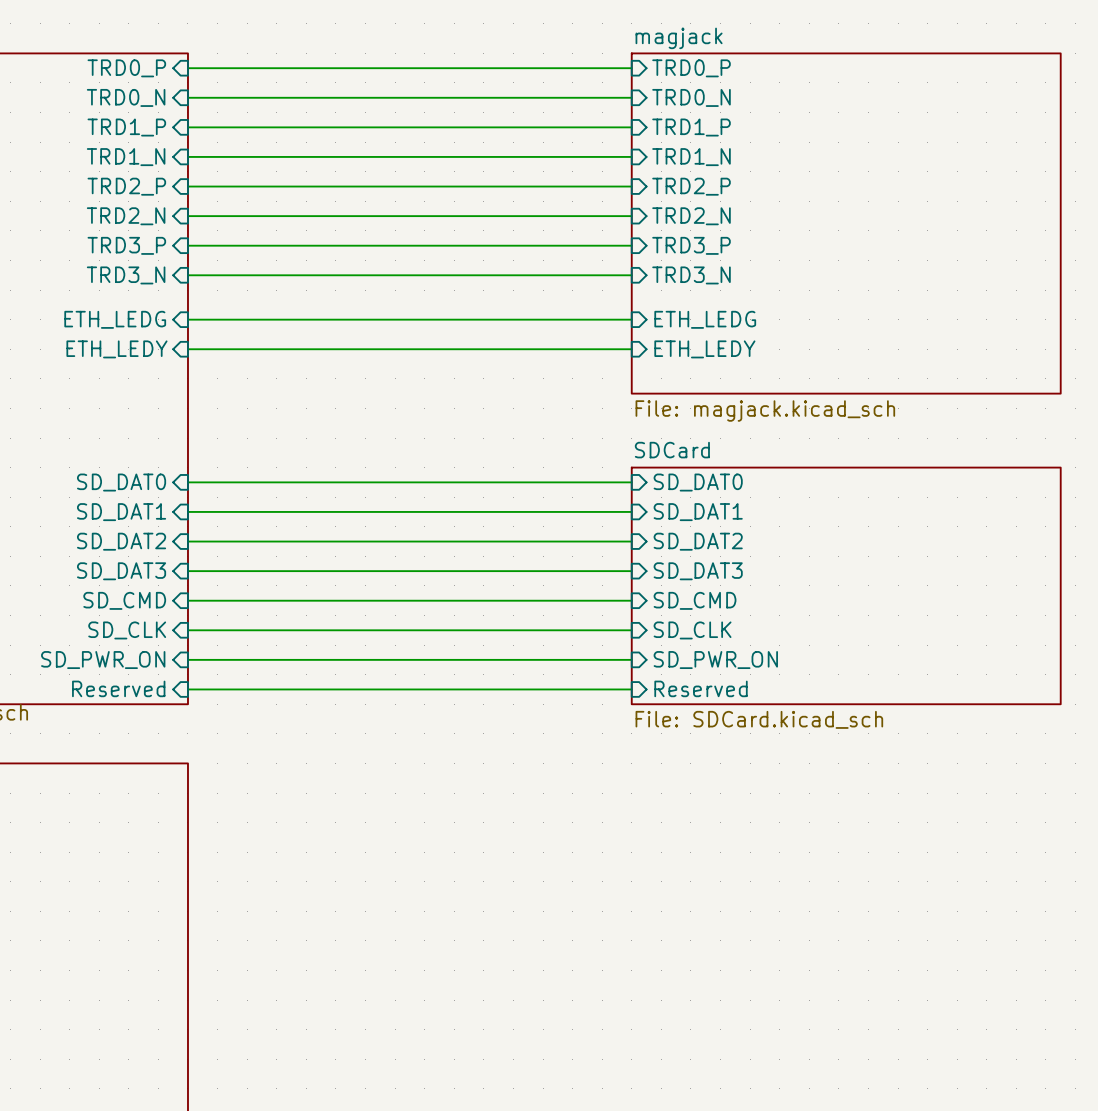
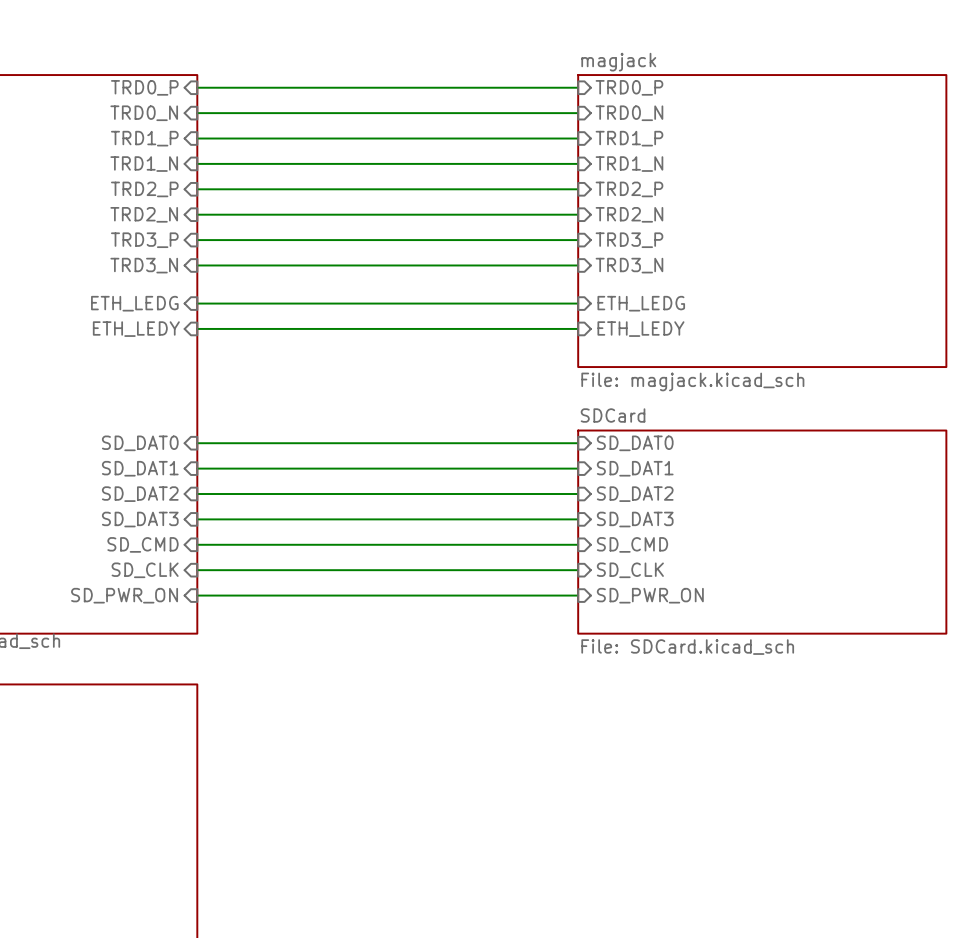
sheet pin: Reserved (118, 688) -> none
sheet pin: Reserved (701, 688) -> none
wire: (187, 689) (631, 689) -> none

